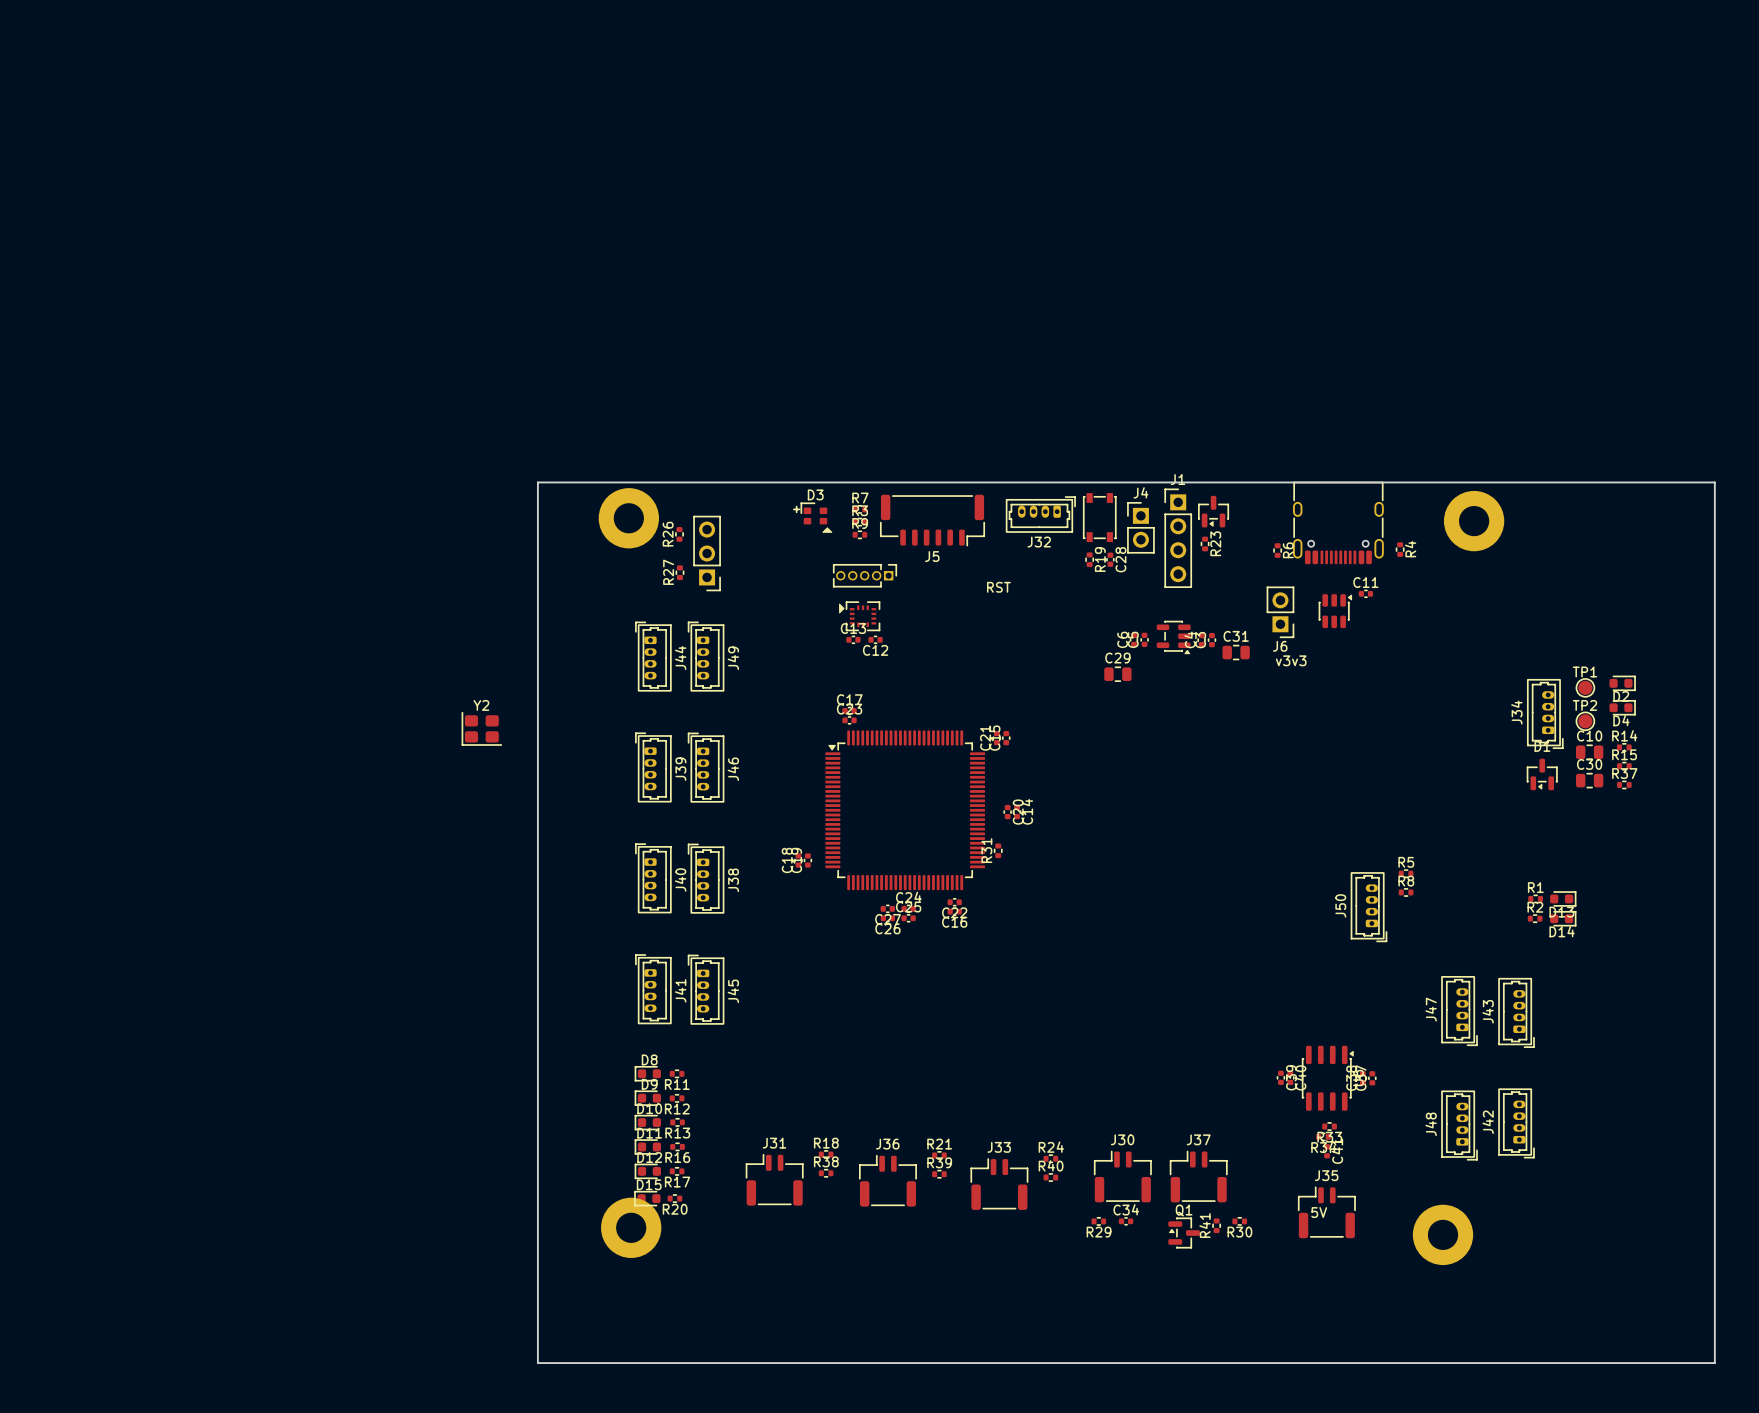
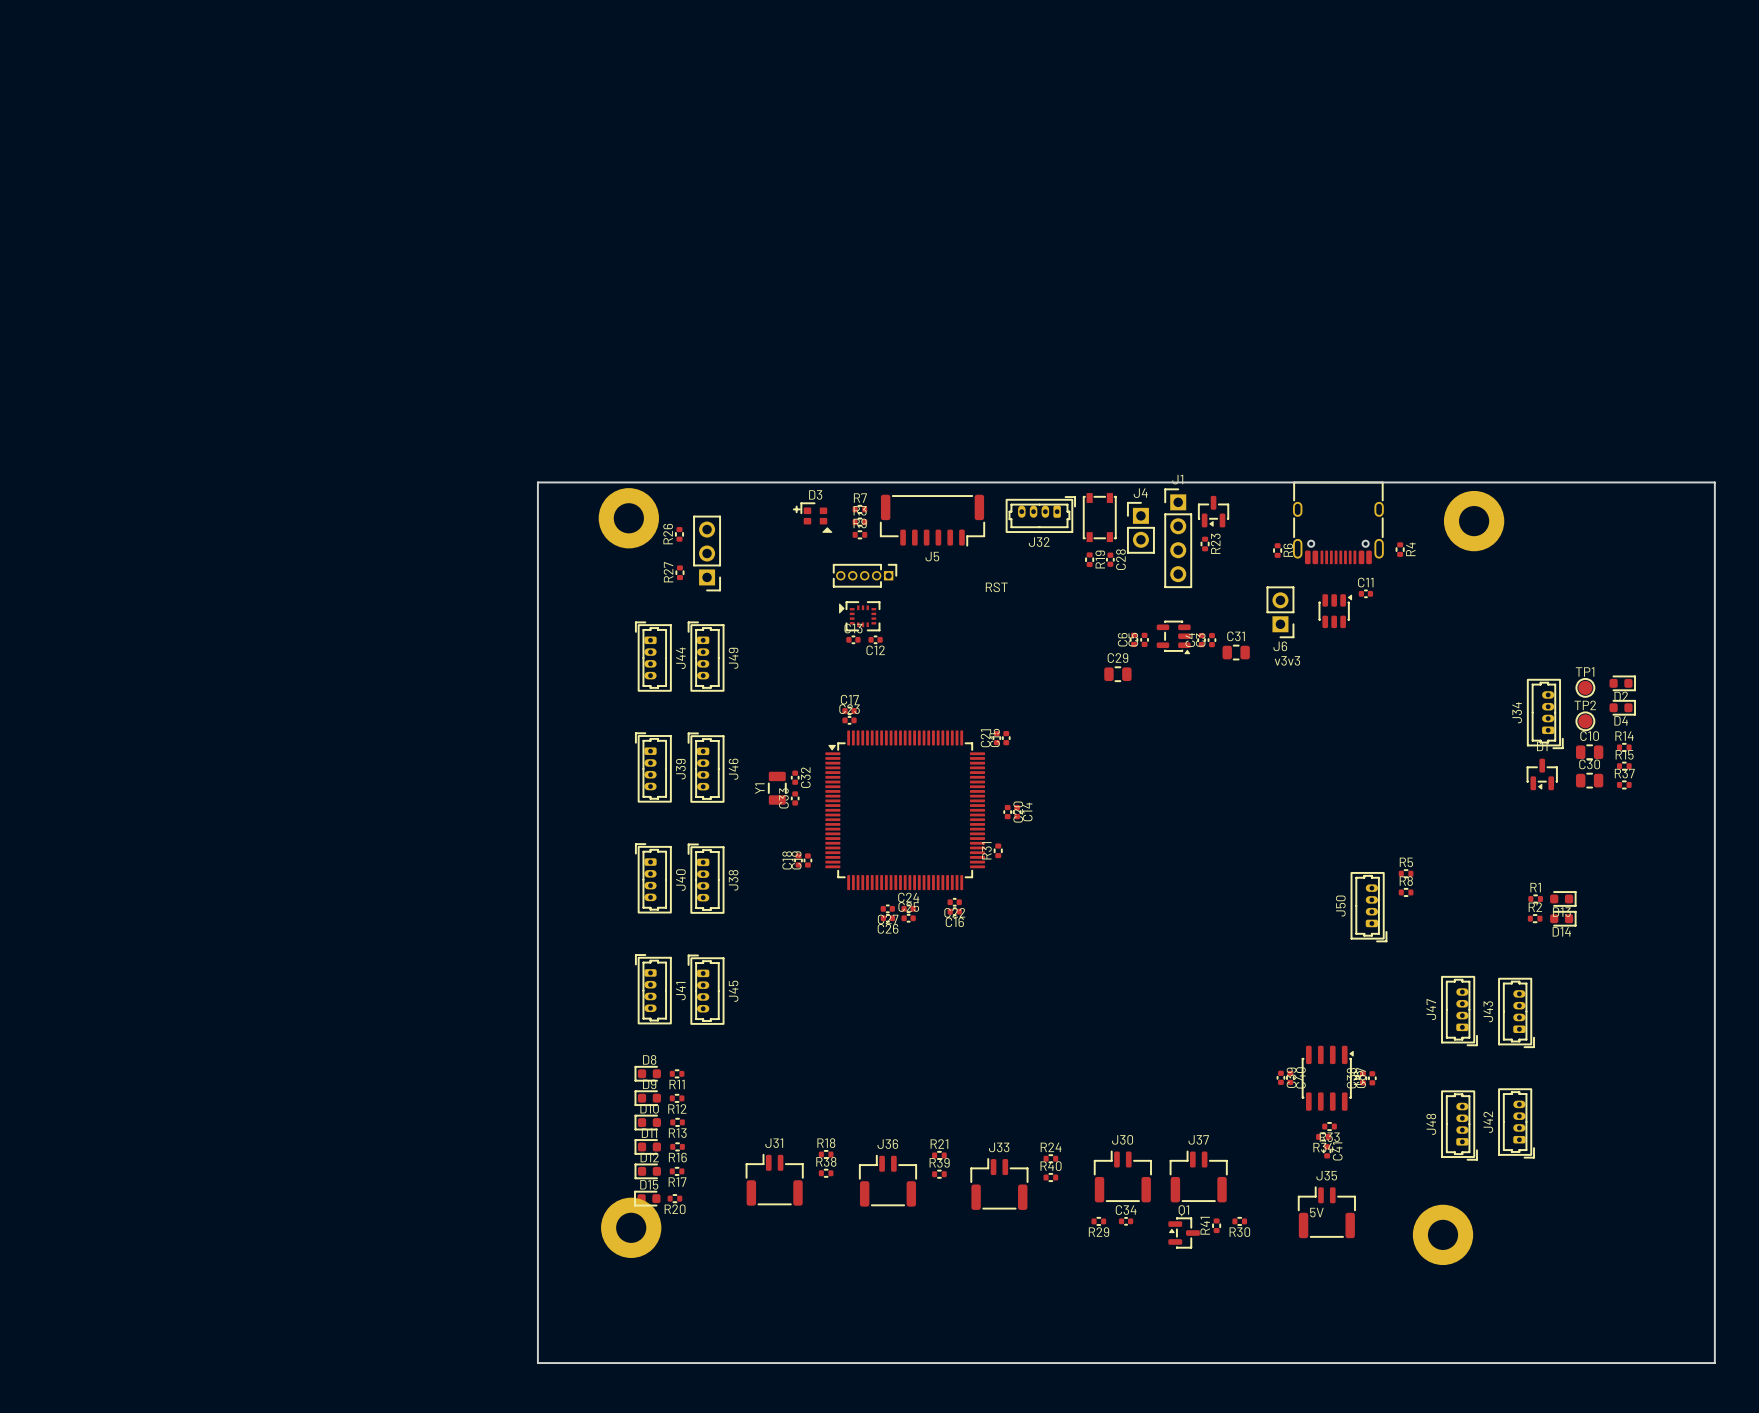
Y2: (481, 728) -> none
C32: none -> (795, 777)
Y1: none -> (777, 788)
C33: none -> (795, 798)

